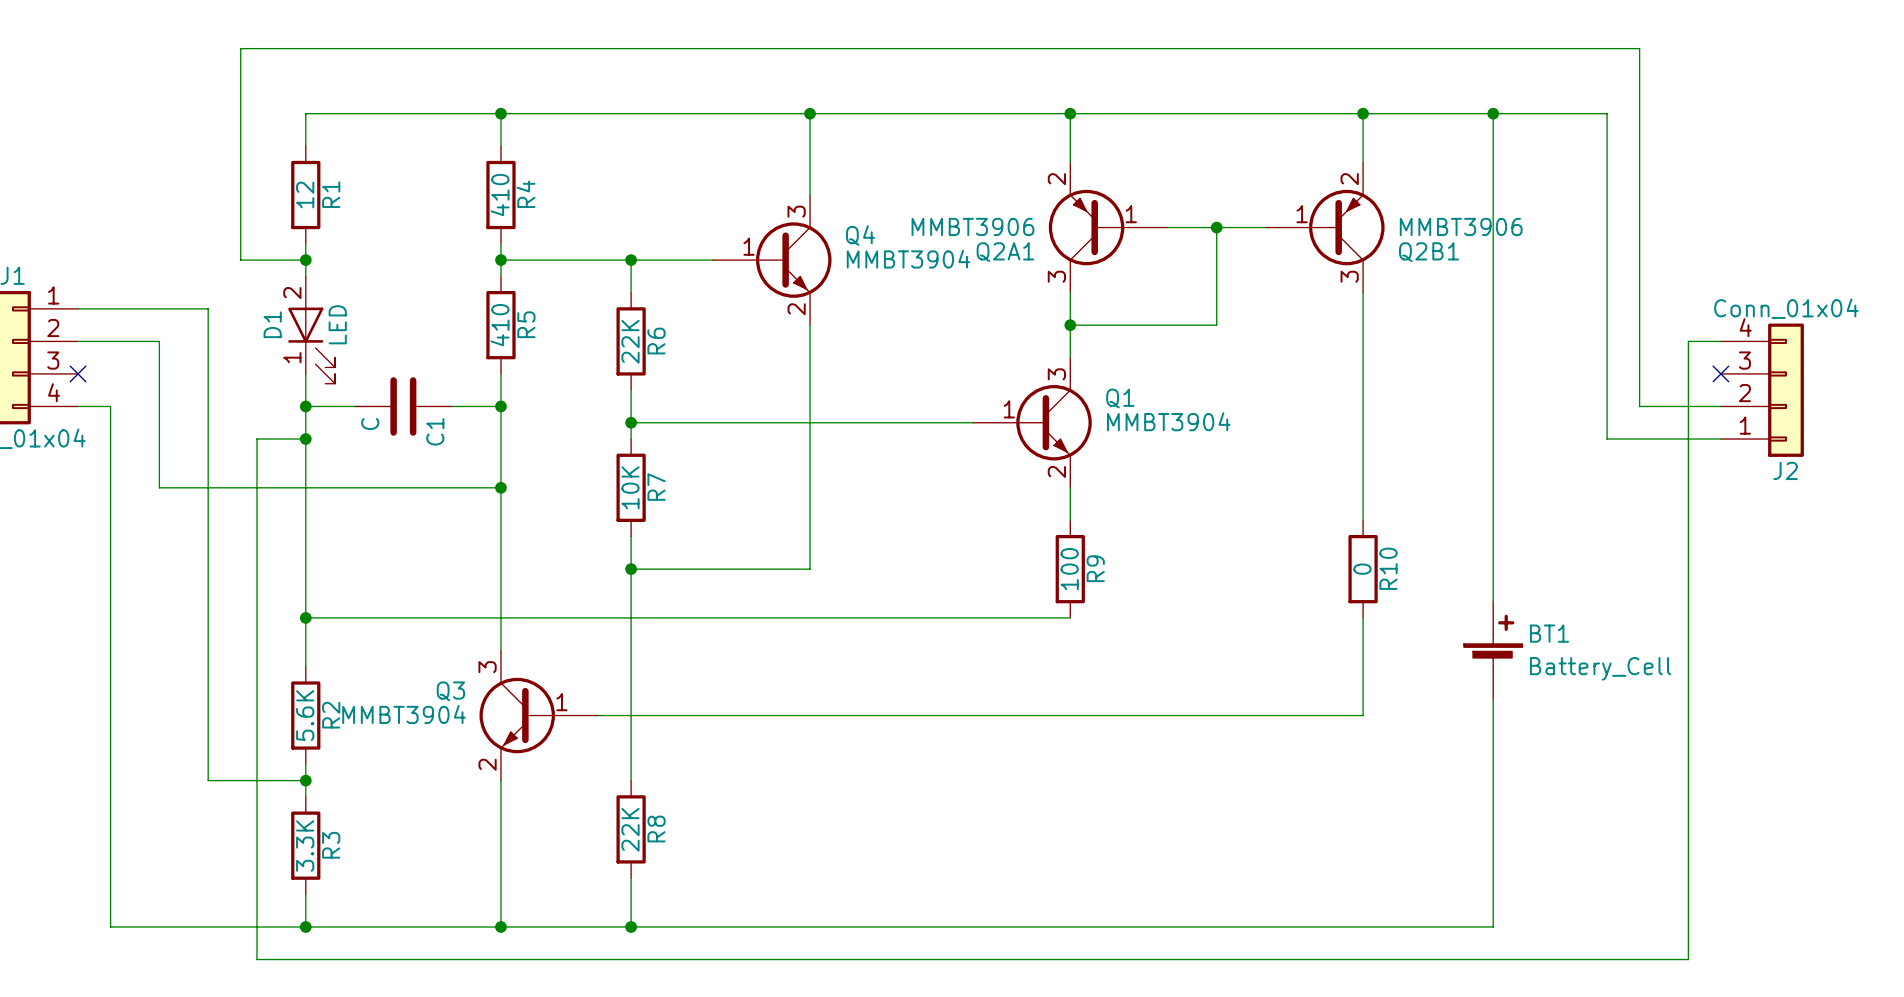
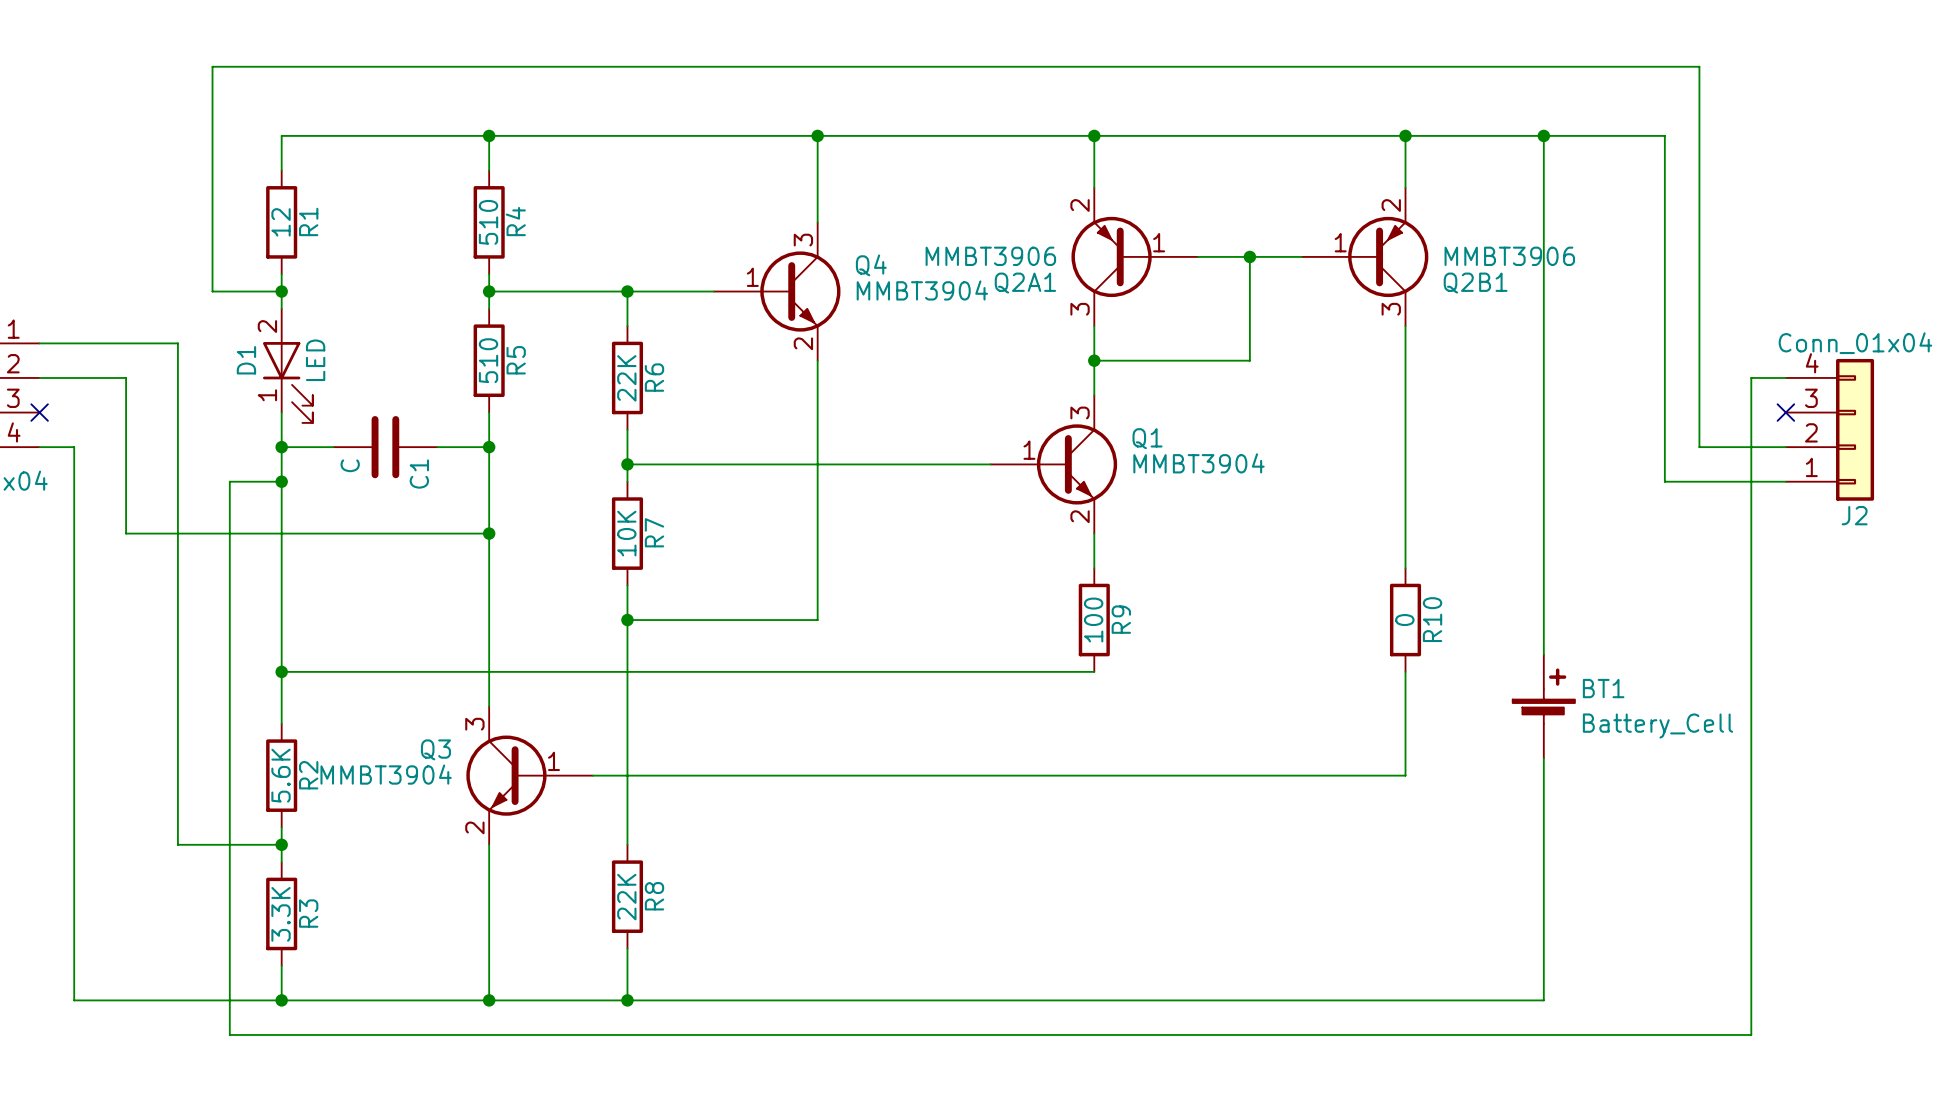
R4 value: 410 (499, 195) -> 510 (488, 222)
R5 value: 410 (499, 325) -> 510 (488, 360)

